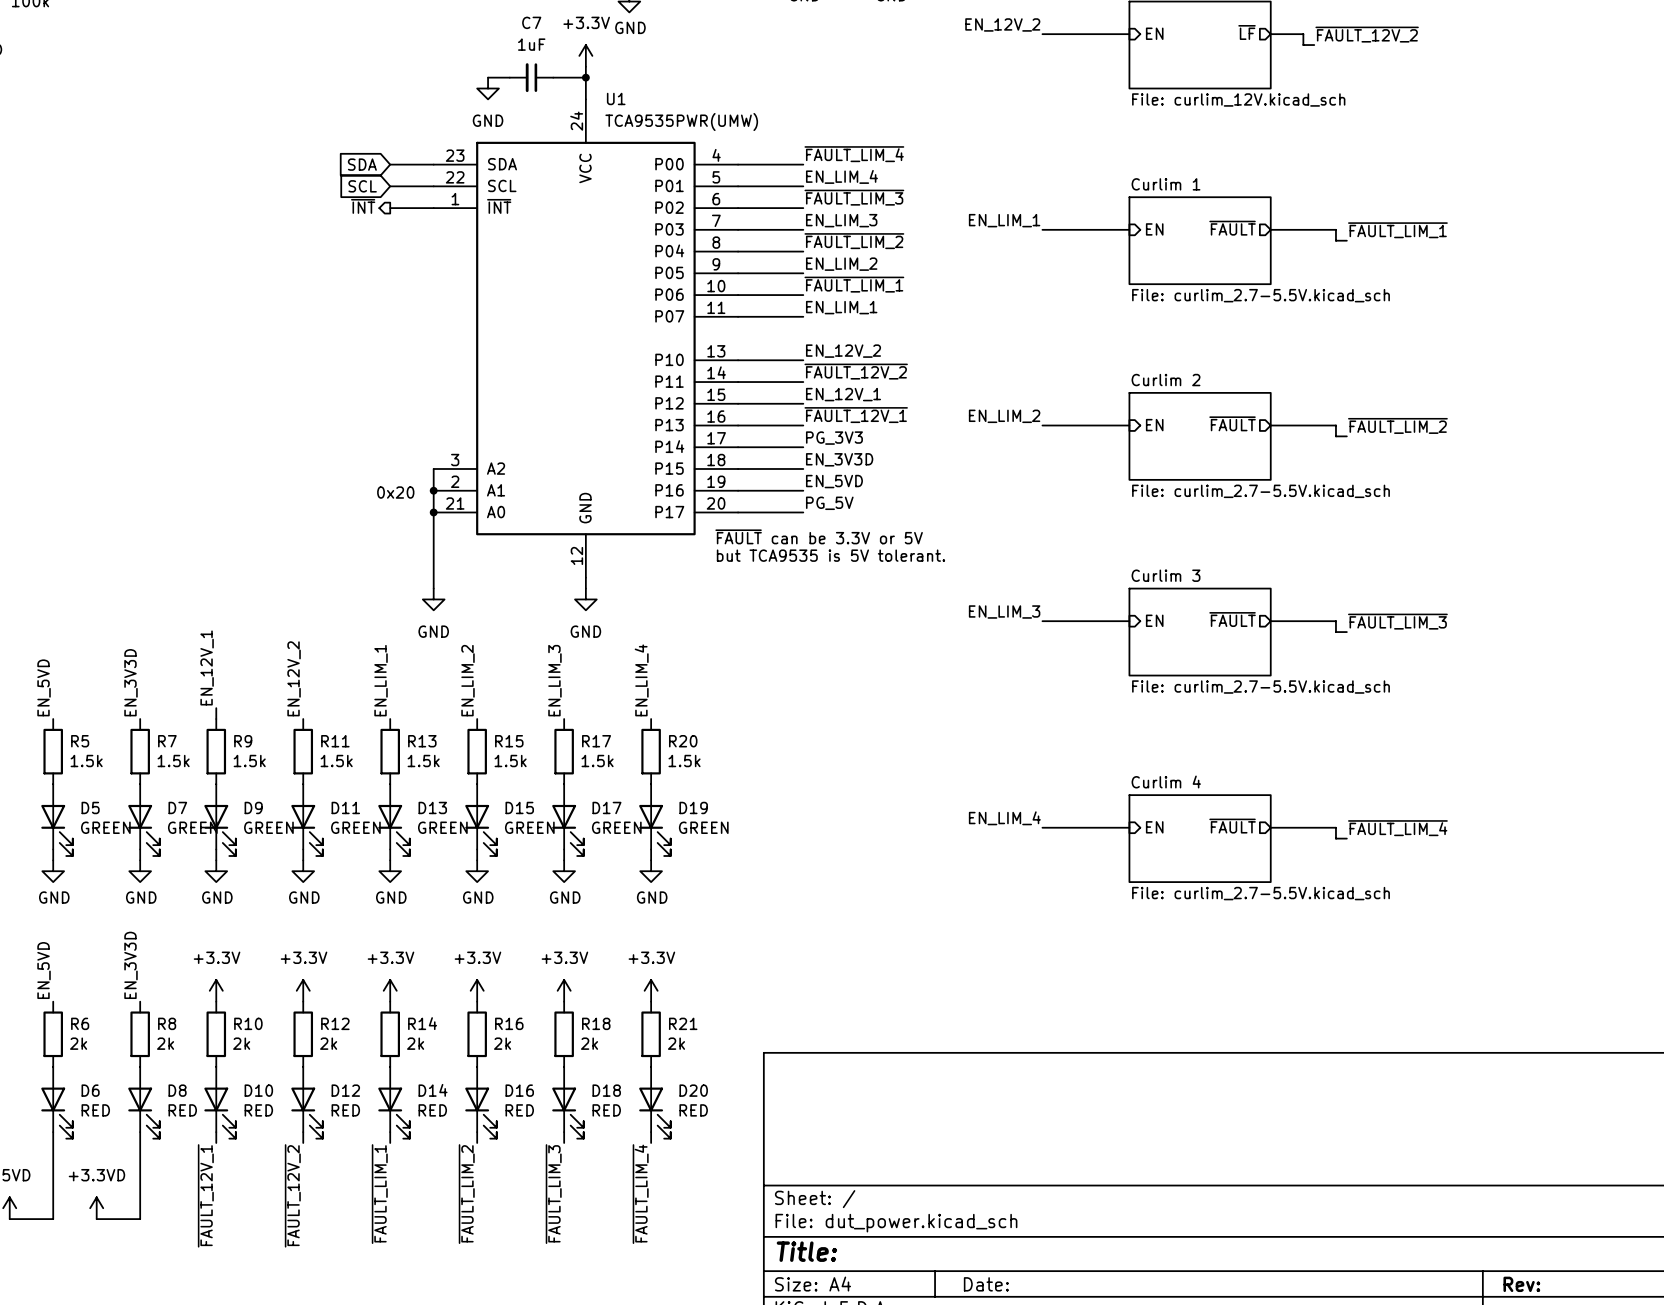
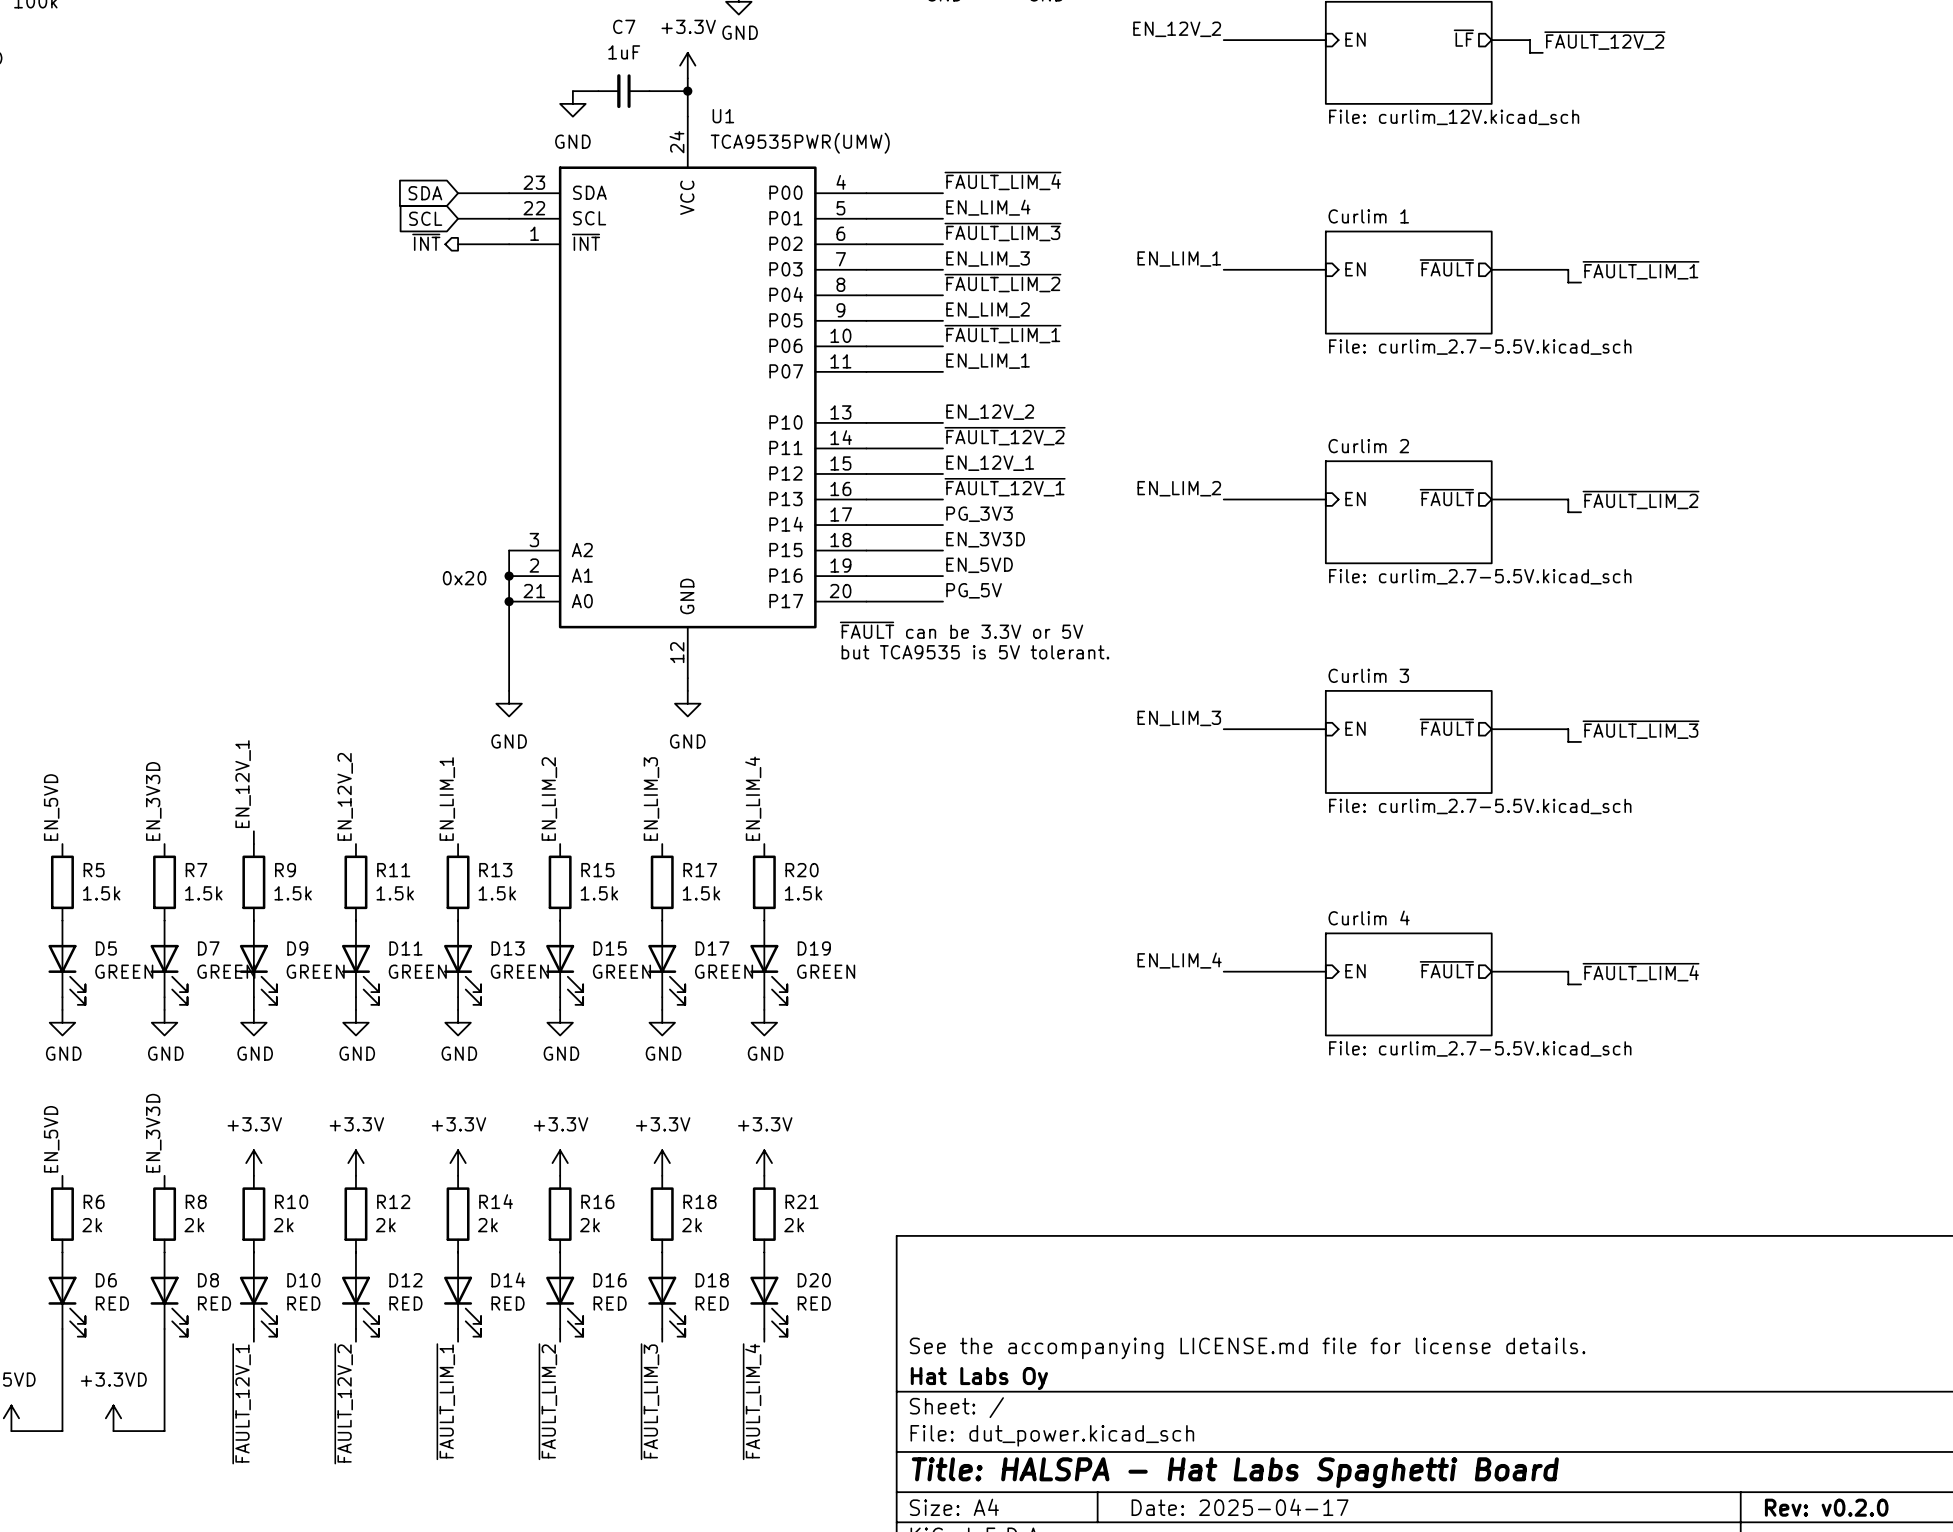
title block: none -> See the accompanying LICENSE.md file for license details. (1247, 1348)
title block: none -> Hat Labs Oy (979, 1378)
title block: Title: (806, 1251) -> Title: HALSPA - Hat Labs Spaghetti Board (1235, 1472)
title block: Date: (986, 1284) -> Date: 2025-04-17 (1240, 1507)
title block: Rev: (1521, 1284) -> Rev: v0.2.0 (1826, 1507)

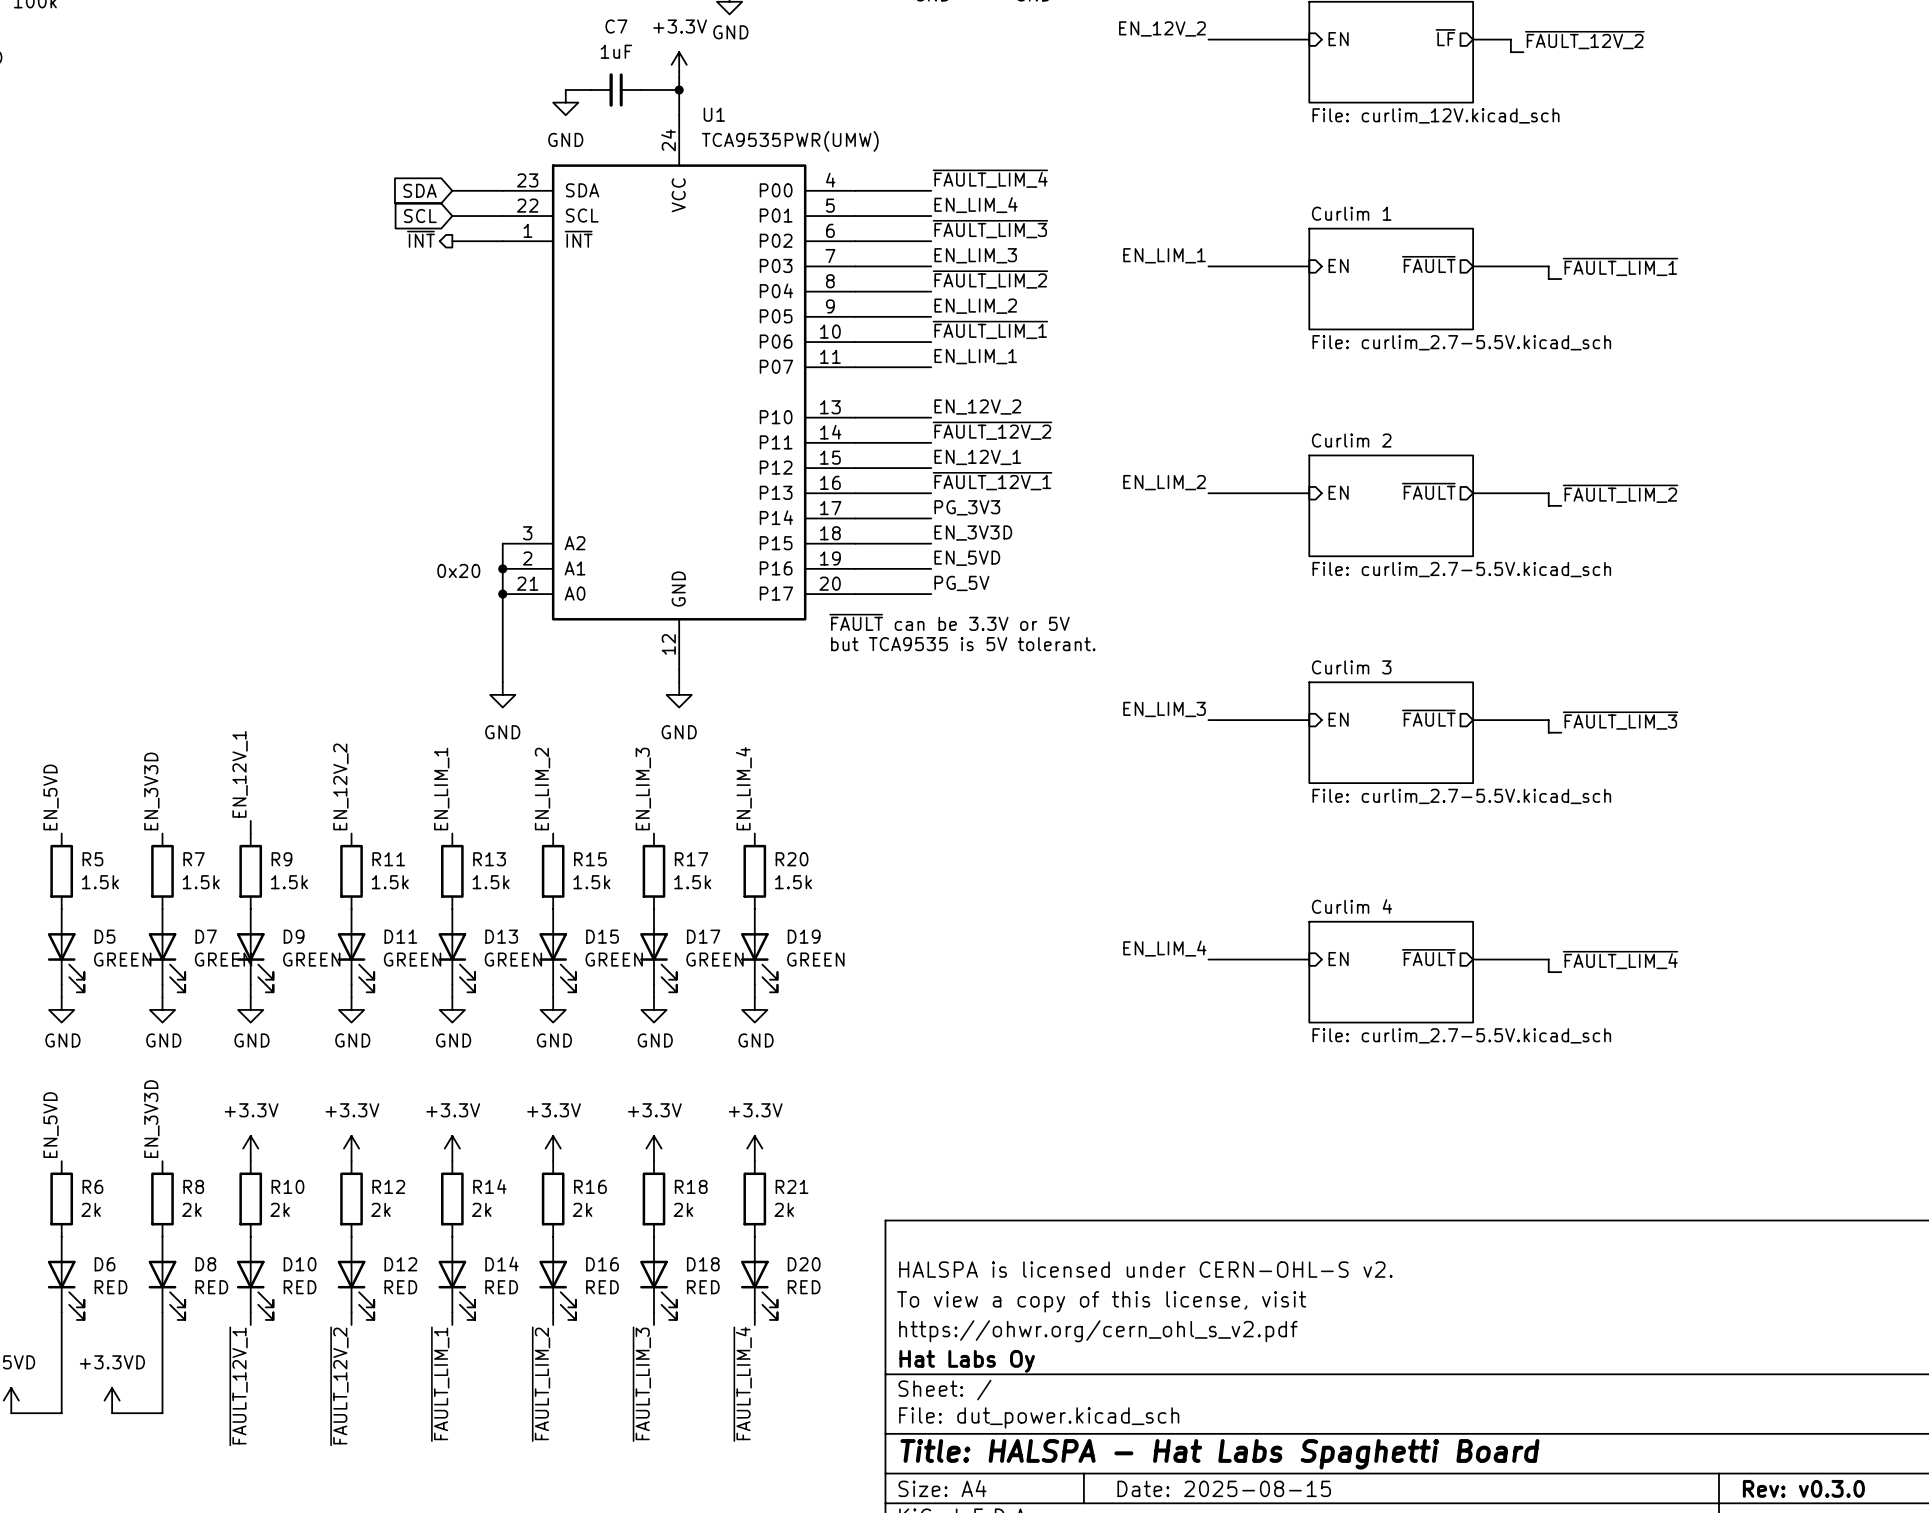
title block: none -> HALSPA is licensed under CERN-OHL-S v2. (1145, 1269)
title block: none -> To view a copy of this license, visit (1101, 1301)
title block: See the accompanying LICENSE.md file for license details. (1247, 1348) -> https://ohwr.org/cern_ohl_s_v2.pdf (1098, 1331)
title block: Date: 2025-04-17 (1240, 1507) -> Date: 2025-08-15 (1224, 1488)
title block: Rev: v0.2.0 (1826, 1507) -> Rev: v0.3.0 (1803, 1488)

